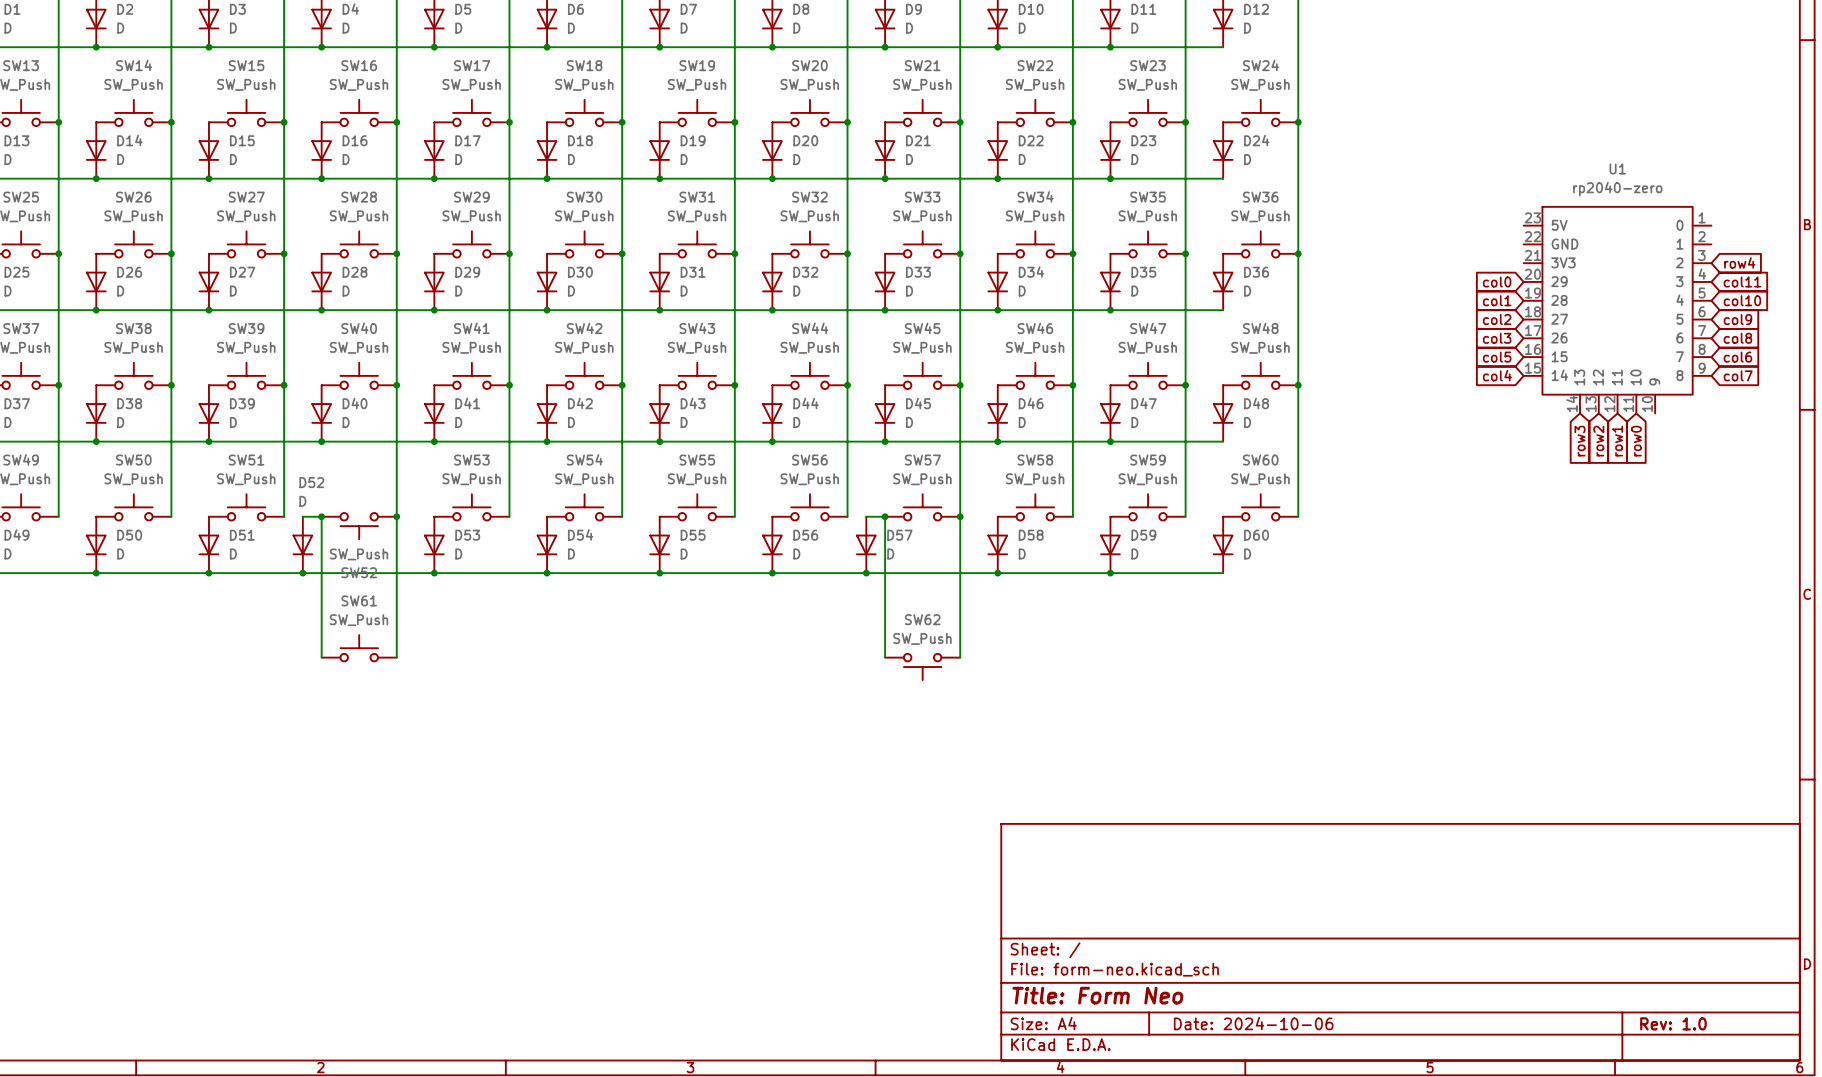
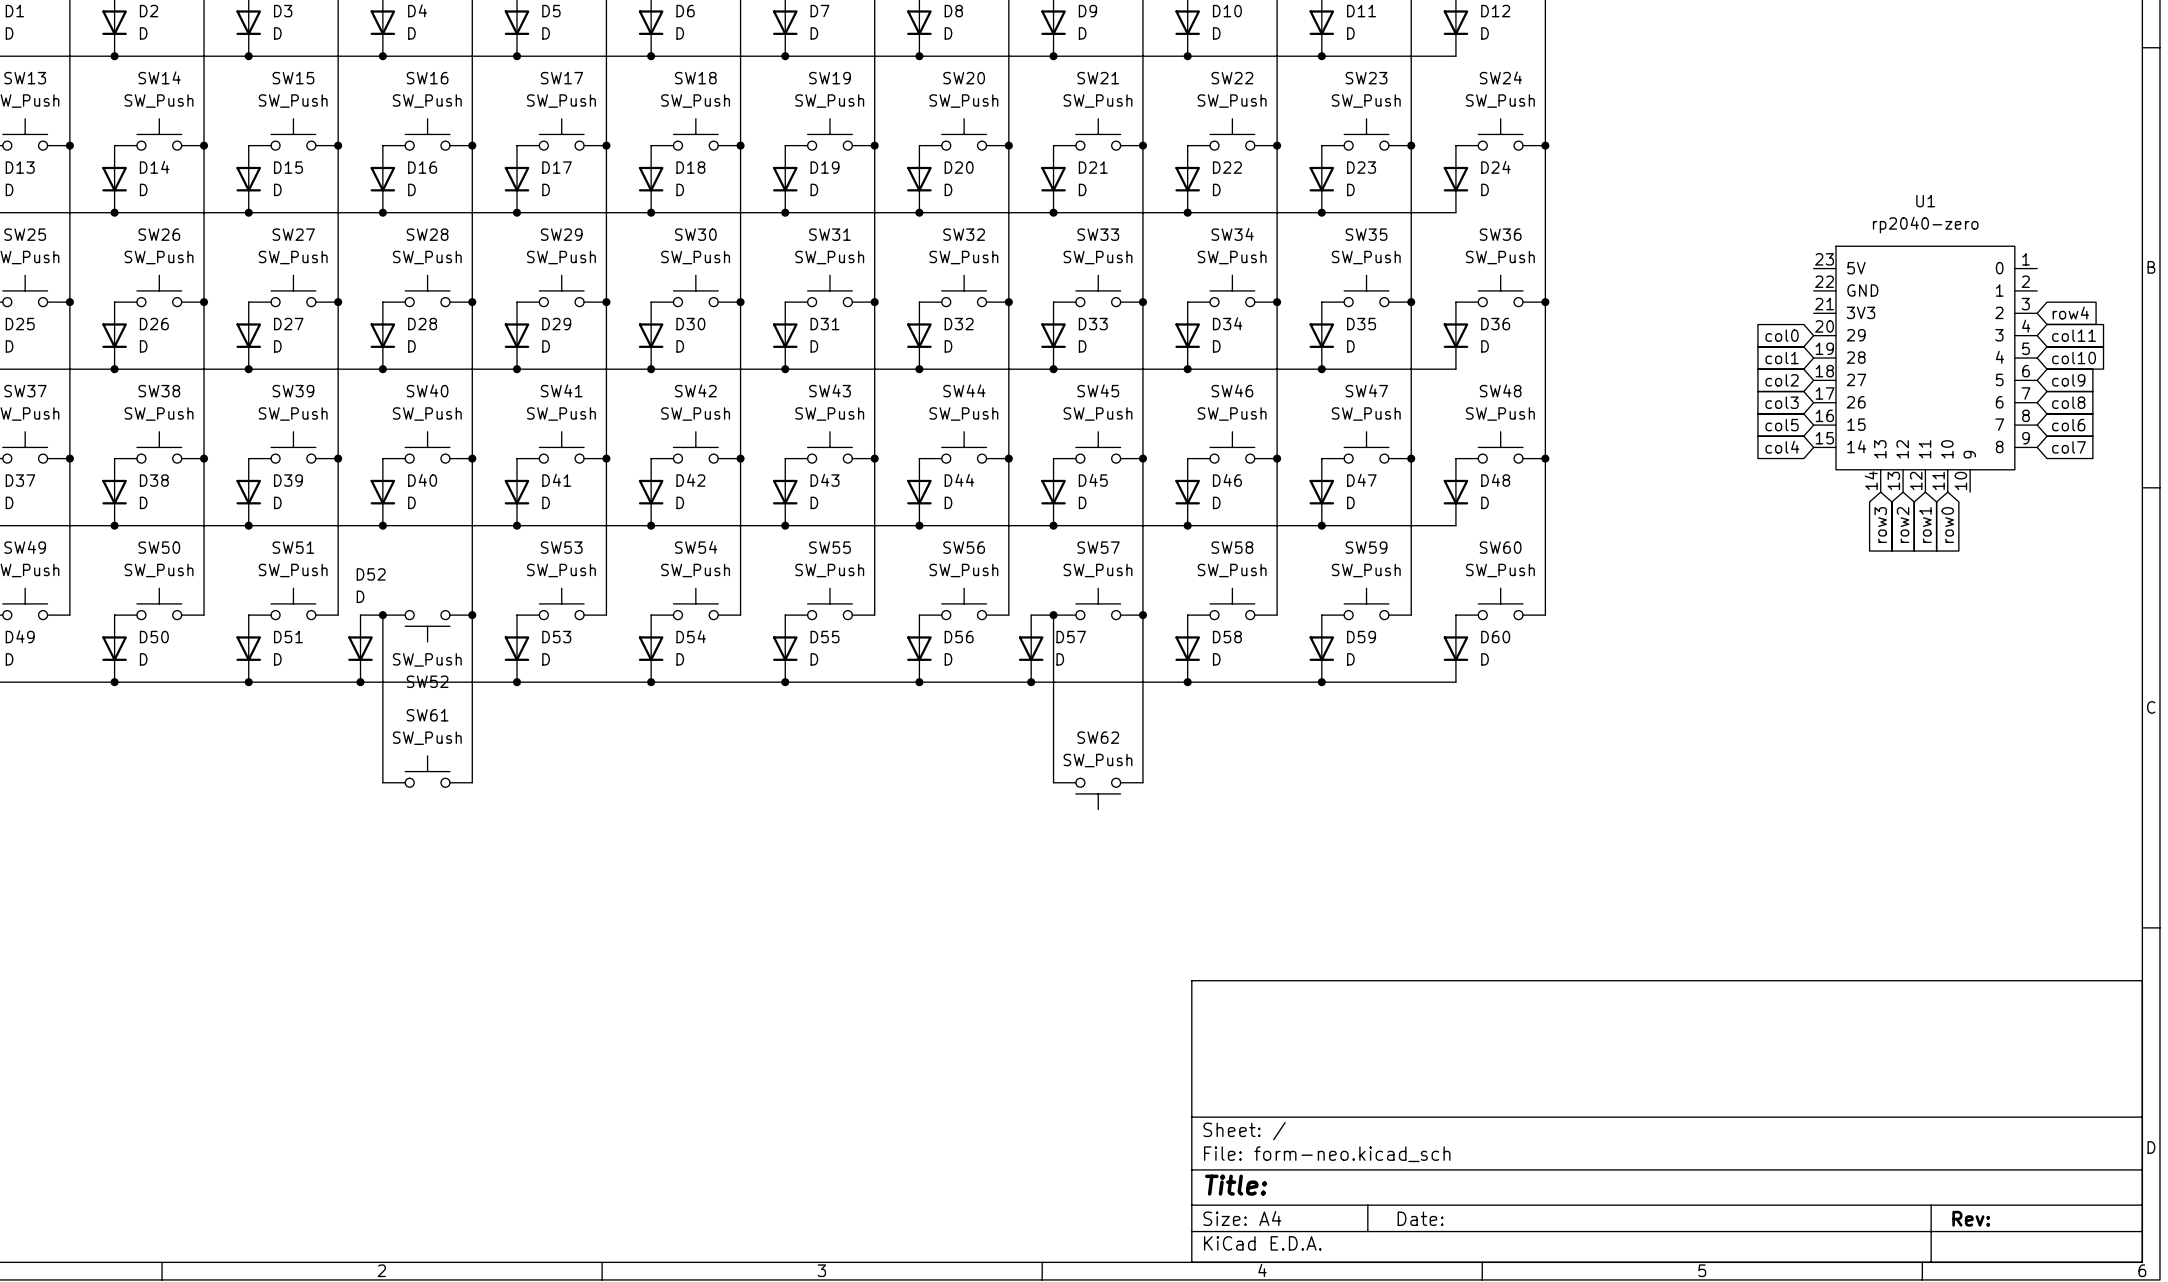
title block: Title: Form Neo (1097, 995) -> Title: (1236, 1185)
title block: Date: 2024-10-06 (1253, 1023) -> Date: (1420, 1218)
title block: Rev: 1.0 (1673, 1023) -> Rev: (1971, 1218)

